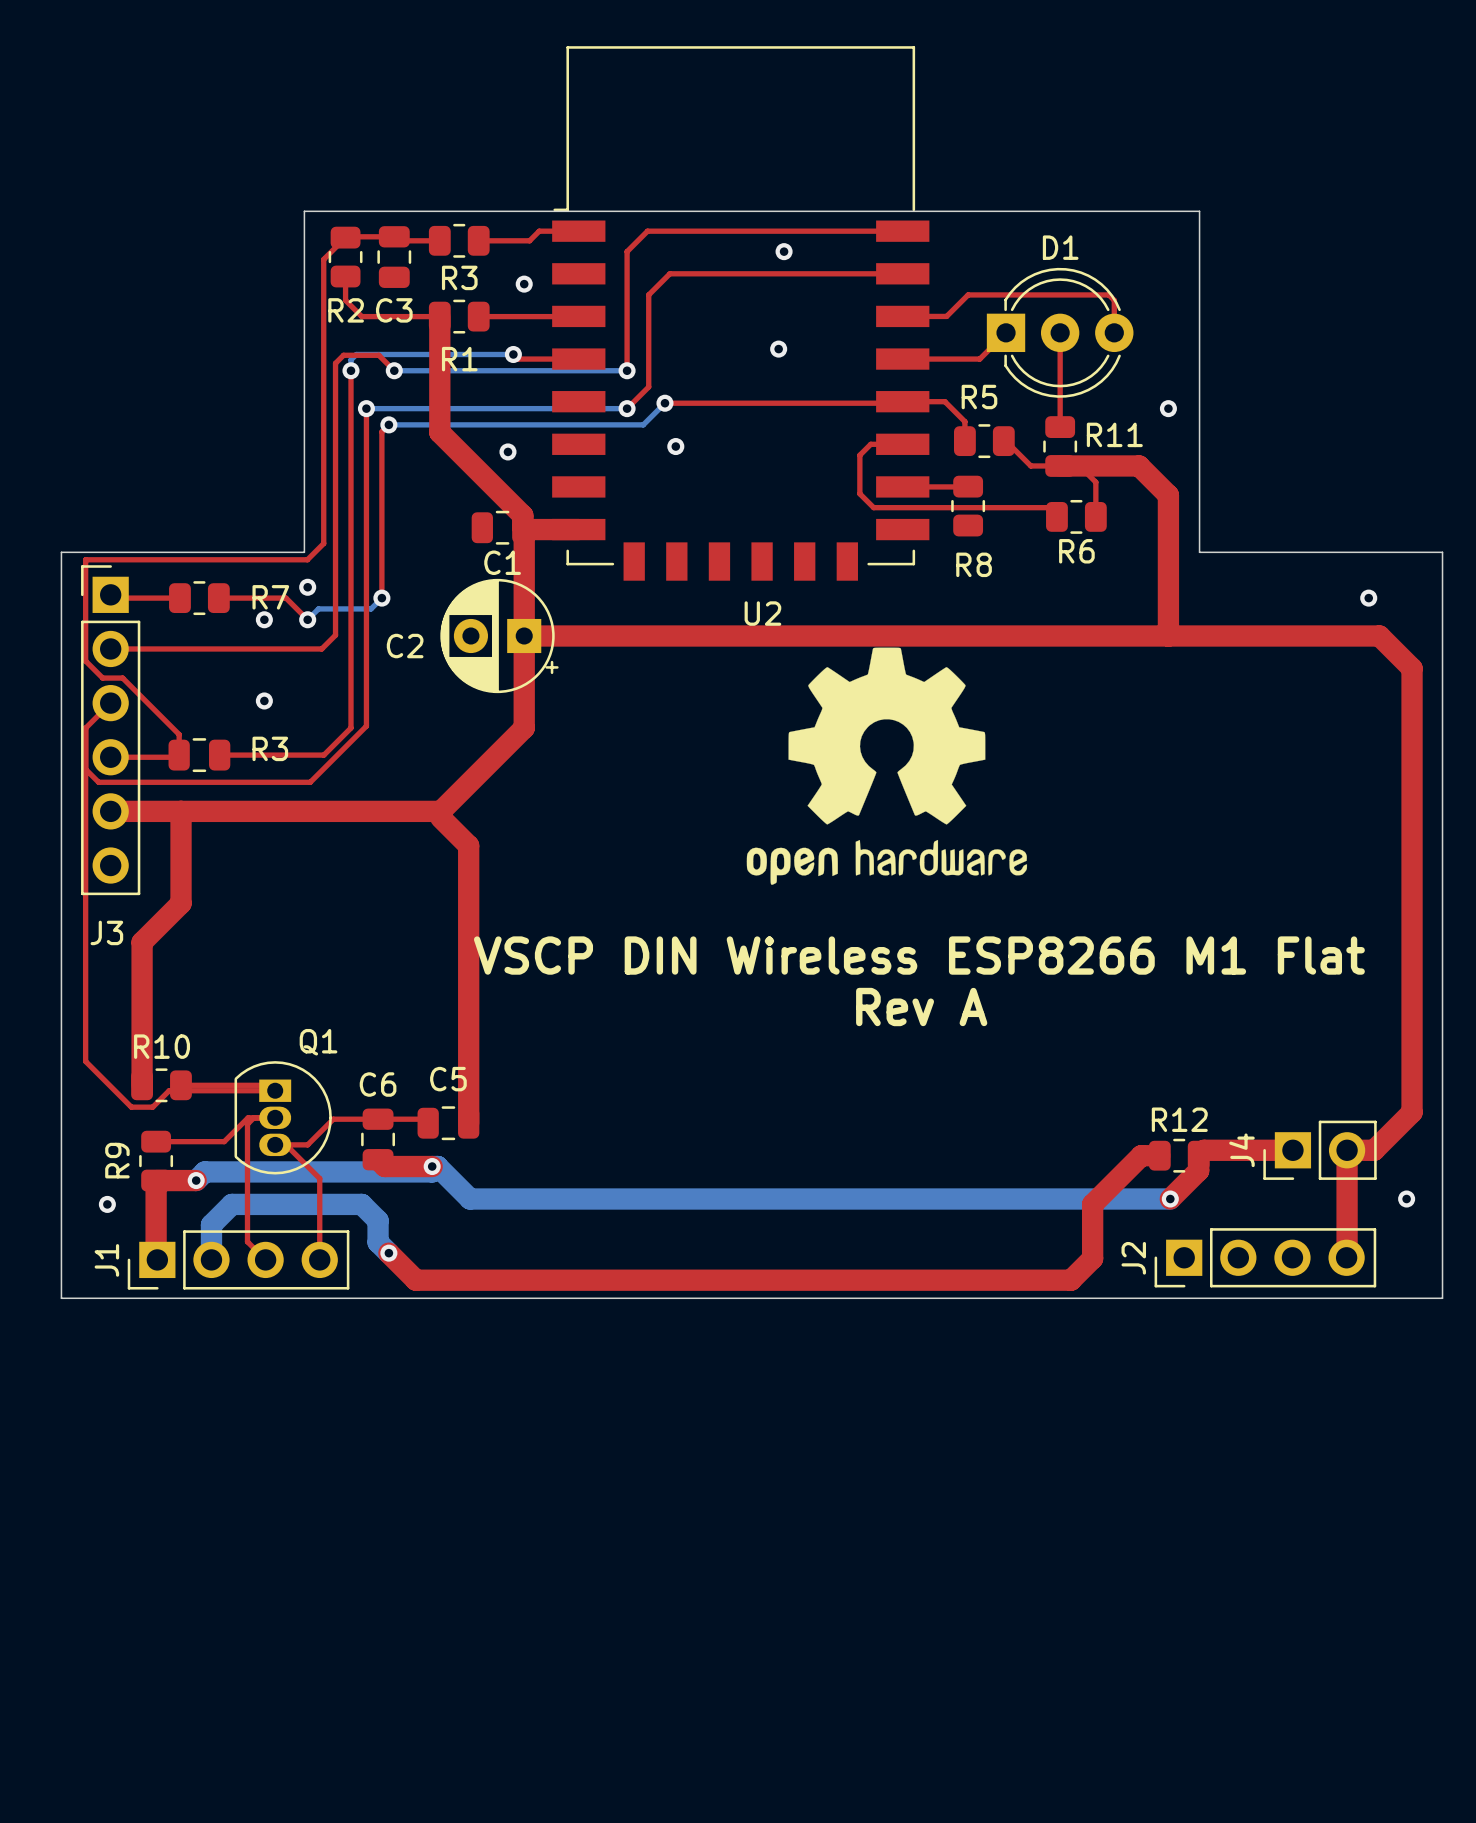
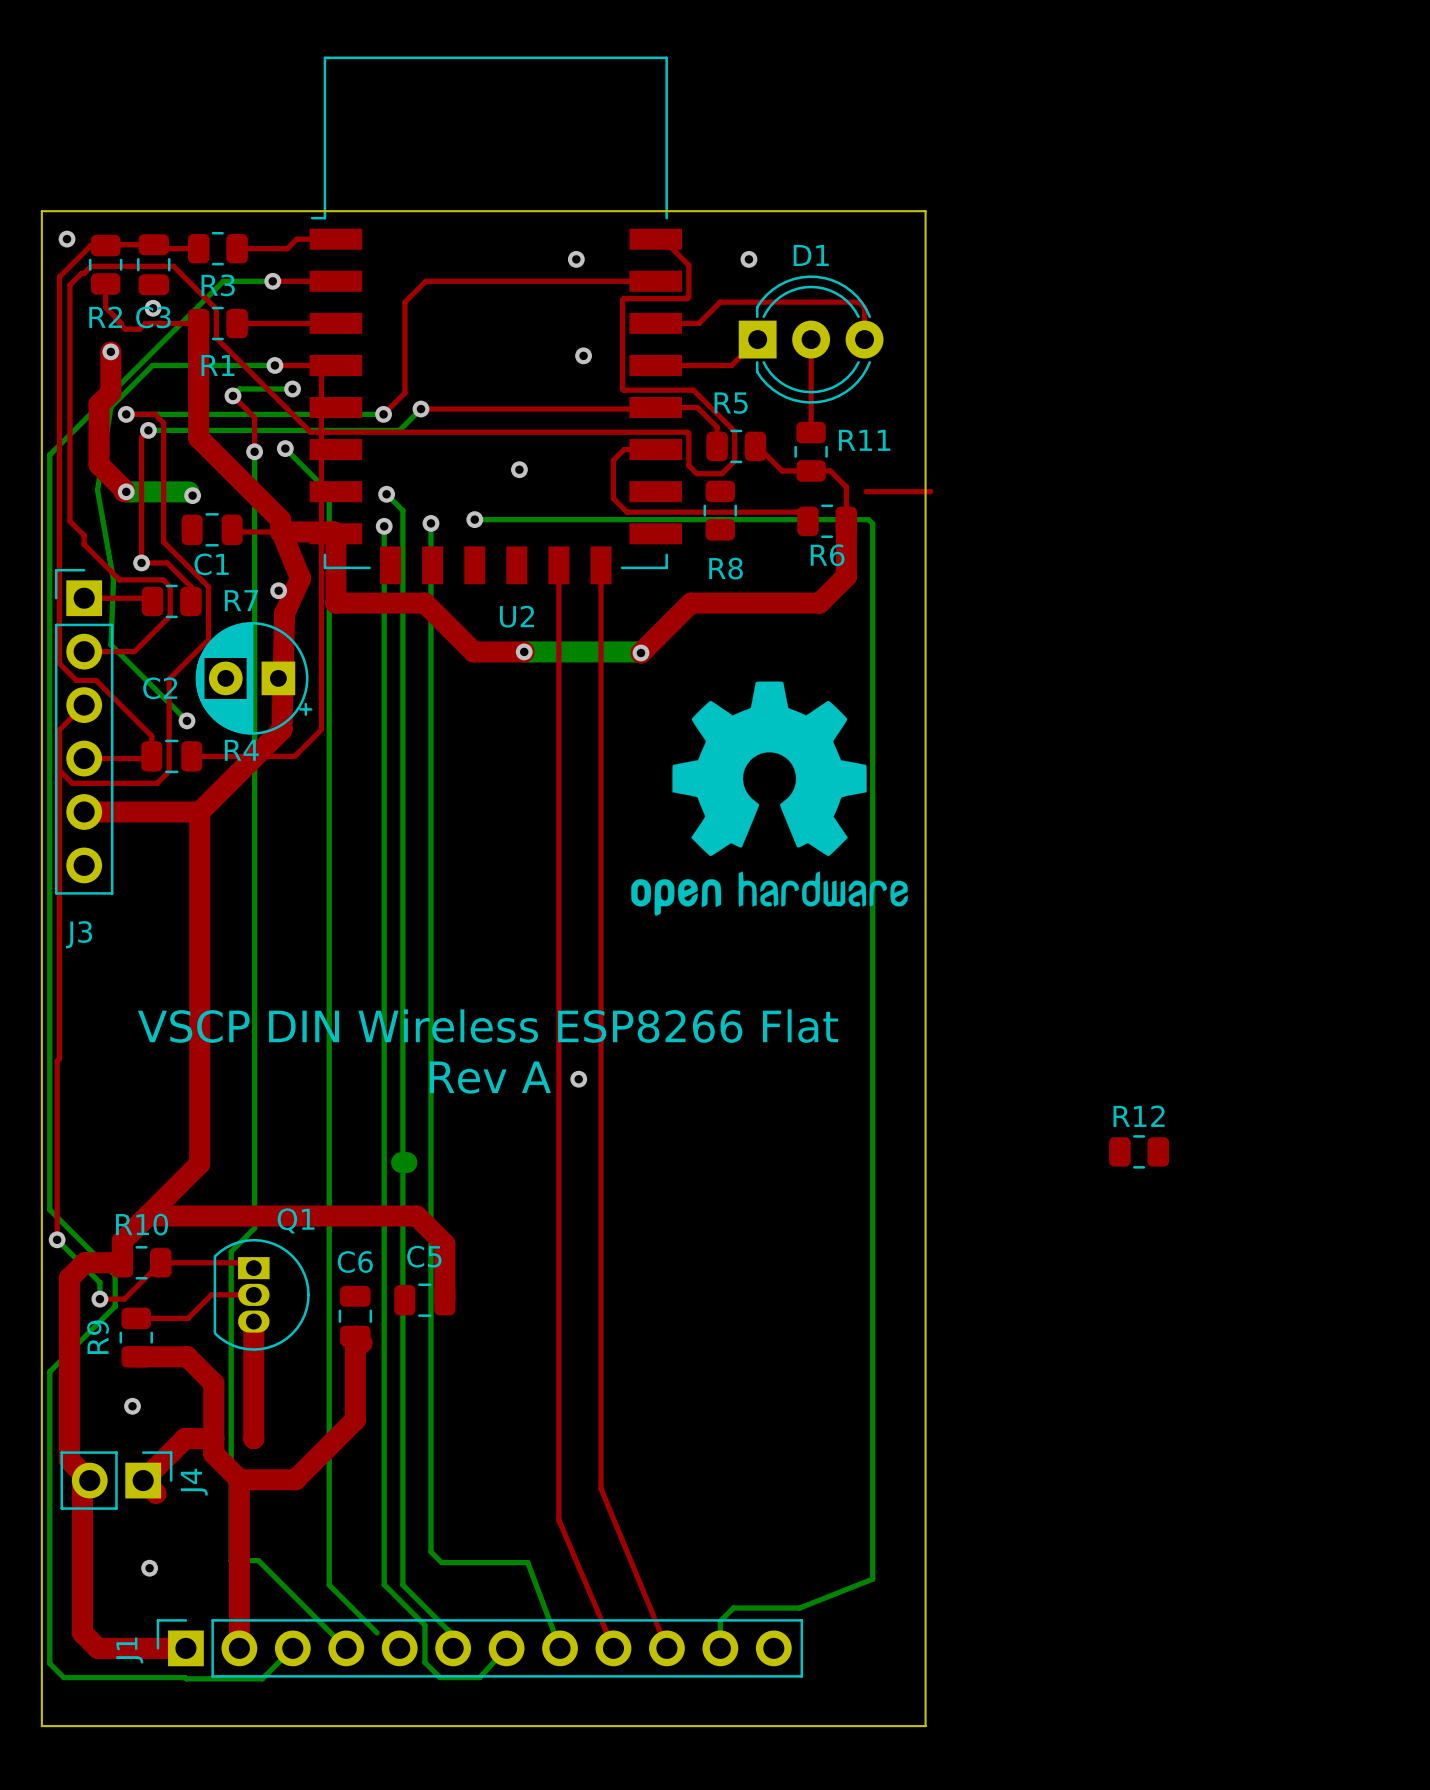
board edge: (304, 211) (304, 552) (61, 552) (61, 1298) (1442, 1298) (1442, 552) (1199, 552) (1199, 211) (304, 211) -> (41, 211) (41, 1726) (925, 1726) (925, 211) (41, 211)
via: none -> (67, 239)
top track: (578, 231) (539, 231) (529, 240) (478, 240) -> (335, 239) (296, 239) (287, 248) (237, 248)
top track: (689, 231) (647, 231) (627, 251) (627, 370) -> none
top track: (696, 231) (902, 231) -> none
top track: (439, 240) (398, 240) (394, 236) (346, 236) (323, 259) (323, 543) (307, 559) (85, 559) -> (198, 248) (157, 248) (153, 244) (90, 245) (59, 277) (59, 563)
R3 position: (459, 240) -> (217, 248)
via: none -> (576, 259)
R2 position: (345, 257) -> (105, 264)
C3 position: (394, 257) -> (153, 264)
top track: none -> (272, 281) (335, 281)
bottom track: none -> (272, 281) (223, 281) (49, 454) (49, 1209) (115, 1275) (115, 1306) (49, 1371) (49, 1663) (63, 1677) (262, 1678) (292, 1648)
via: none -> (272, 281)
top track: (669, 273) (648, 294) (648, 386) (627, 408) -> (636, 281) (425, 281) (404, 302) (404, 393) (383, 414)
top track: (689, 273) (902, 273) -> (420, 409) (631, 409)
top track: none -> (105, 283) (105, 307) (121, 323)
top track: (345, 276) (345, 300) (361, 316) -> (237, 323) (332, 323)
via: (524, 284) -> none
via: none -> (153, 308)
top track: none -> (115, 317) (125, 329) (139, 329) (145, 323) (198, 323) (198, 437) (280, 519) (280, 531)
U2 position: (740, 313) -> (495, 320)
top track: (365, 316) (439, 316) (439, 432) (522, 515) (522, 527) (524, 529) (578, 529) -> none
R1 position: (459, 316) -> (217, 323)
top track: (478, 316) (578, 316) -> none
top track: (902, 316) (946, 316) (968, 294) (1108, 294) (1114, 300) (1114, 332) -> (655, 323) (699, 323) (720, 302) (859, 302) (864, 307) (864, 339)
top track: (1006, 332) (979, 359) (902, 359) -> (757, 339) (731, 365) (655, 365)
top track: (1060, 332) (1060, 427) -> (811, 339) (811, 432)
D1 position: (1060, 332) -> (811, 339)
top track: none -> (110, 351) (110, 392) (99, 404) (99, 464) (124, 491)
via: none -> (110, 351)
via: (778, 349) -> none
top track: (513, 354) (517, 359) (578, 359) -> none
bottom track: (513, 354) (356, 354) (350, 359) (350, 370) -> none
via: (513, 354) -> none
top track: none -> (274, 365) (335, 365)
bottom track: none -> (274, 365) (152, 365) (111, 407) (97, 490) (113, 580) (111, 644) (187, 720)
via: none -> (274, 365)
via: (350, 370) -> none
top track: (394, 370) (378, 355) (343, 355) (335, 363) (335, 635) (321, 648) (161, 648) -> (662, 239) (688, 265) (688, 297) (622, 300) (622, 388) (693, 390) (734, 431) (734, 460) (721, 473) (697, 473) (688, 465) (687, 432) (310, 432) (216, 338) (216, 309) (173, 266) (91, 266) (81, 273) (69, 285) (69, 521) (84, 535) (84, 544) (119, 579) (163, 579) (170, 586) (170, 615) (134, 651)
bottom track: (394, 370) (627, 370) -> none
via: (394, 370) -> none
via position: (627, 370) -> (583, 355)
bottom track: none -> (292, 388) (239, 388) (232, 395)
via: none -> (292, 388)
top track: none -> (232, 395) (254, 417) (254, 451)
via: none -> (232, 395)
via: none -> (420, 409)
bottom track: (664, 403) (643, 424) (430, 424) -> (420, 409) (399, 430)
via: (664, 403) -> none
top track: (688, 403) (944, 401) (964, 421) (964, 441) -> (654, 409) (697, 407) (717, 427) (717, 446)
bottom track: none -> (126, 414) (336, 414)
via: none -> (126, 414)
top track: (366, 408) (366, 726) (310, 782) (184, 782) -> (126, 414) (154, 414) (163, 423) (163, 542) (208, 586) (208, 639) (169, 679) (169, 771) (157, 783)
via: (366, 408) -> none
bottom track: (413, 408) (627, 408) -> (148, 430) (358, 430)
via: none -> (383, 414)
via: (627, 408) -> none
via: (1168, 408) -> none
via: none -> (148, 430)
top track: (388, 424) (381, 431) (381, 598) -> none
via: (388, 424) -> none
top track: none -> (755, 446) (782, 470) (830, 470) (846, 487) (846, 576) (819, 603) (690, 603) (641, 653)
R5 position: (984, 441) -> (736, 446)
top track: (1003, 441) (1030, 465) (1079, 465) (1095, 482) (1095, 516) -> none
bottom track: none -> (285, 448) (329, 492) (329, 1585) (377, 1632)
via: none -> (285, 448)
top track: (902, 444) (870, 444) (859, 455) (859, 493) (873, 507) (1047, 507) (1056, 516) -> (655, 449) (624, 449) (613, 460) (613, 498) (627, 512) (798, 512) (807, 521)
bottom track: none -> (254, 451) (254, 1228) (231, 1251) (231, 1560) (258, 1560) (346, 1648)
via: none -> (254, 451)
via: (675, 446) -> none
R11 position: (1060, 446) -> (811, 451)
via: (507, 451) -> none
via: none -> (519, 469)
top track: (1060, 465) (1139, 465) (1168, 495) (1168, 636) -> none
bottom track: none -> (126, 491) (188, 491) (192, 495)
via: none -> (126, 491)
bottom track: none -> (386, 494) (402, 510) (402, 1585) (453, 1635) (453, 1648)
via: none -> (386, 494)
via: none -> (192, 495)
R8 position: (968, 506) -> (720, 510)
bottom track: none -> (474, 519) (868, 519) (872, 523) (872, 1579) (799, 1608) (733, 1608) (720, 1621) (720, 1648)
via: none -> (474, 519)
R6 position: (1076, 516) -> (827, 521)
bottom track: none -> (430, 523) (430, 1551) (441, 1562) (527, 1562) (560, 1648)
via: none -> (430, 523)
bottom track: none -> (384, 526) (384, 1584) (424, 1625) (424, 1662) (440, 1677) (479, 1677) (506, 1648)
via: none -> (384, 526)
top track: none -> (232, 529) (234, 531) (280, 531)
top track: none -> (280, 531) (334, 531) (335, 533) (335, 603) (424, 603) (473, 651) (524, 651)
C1 position: (502, 527) -> (212, 529)
top track: none -> (282, 533) (300, 578) (284, 613) (282, 729) (199, 811) (199, 1163) (122, 1241) (122, 1262) (84, 1262) (69, 1278) (69, 1460) (89, 1480) (82, 1487) (82, 1632) (98, 1648) (185, 1648)
top track: (524, 529) (524, 728) (440, 811) -> none
via: none -> (141, 562)
top track: none -> (558, 565) (558, 1520) (613, 1648)
top track: none -> (601, 565) (601, 1488) (666, 1648)
top track: (113, 598) (179, 598) -> (68, 590) (75, 598) (149, 598) (152, 601)
top track: (218, 598) (286, 598) (307, 619) -> (190, 601) (190, 586) (167, 562) (141, 562) (141, 437) (148, 430)
bottom track: (381, 598) (371, 608) (318, 608) (307, 619) -> none
via: (381, 598) -> none
via: (1368, 598) -> none
via: (264, 619) -> none
via: (307, 619) -> none
C2 position: (499, 636) -> (254, 678)
top track: (524, 636) (1379, 636) (1412, 668) (1412, 1112) (1374, 1150) (1347, 1150) (1346, 1257) -> none
bottom track: none -> (524, 651) (641, 653)
via: none -> (524, 651)
via: none -> (641, 653)
via position: (264, 700) -> (187, 720)
R3 name: R3 (270, 748) -> R4 (241, 750)
drawing position: (886, 766) -> (769, 798)
top track: (181, 811) (181, 903) (142, 942) (142, 1085) -> none
top track: (227, 811) (440, 811) -> none
top track: (440, 811) (440, 817) (468, 845) (468, 1123) -> none
text: VSCP DIN Wireless ESP8266 M1 Flat (919, 955) -> none
text position: Rev A (921, 1007) -> Rev A (490, 1077)
text: none -> VSCP DIN Wireless ESP8266 Flat (488, 1026)
top track: (85, 1061) (131, 1107) (152, 1107) (169, 1090) (275, 1090) (269, 1085) (180, 1085) -> (59, 1058) (57, 1061) (57, 1239)
via: none -> (578, 1079)
R10 position: (161, 1085) -> (141, 1262)
top track: (253, 1117) (247, 1124) (247, 1241) (265, 1259) -> none
top track: (275, 1117) (248, 1117) (224, 1141) (156, 1141) -> none
Q1 position: (283, 1117) -> (261, 1294)
top track: (428, 1123) (424, 1119) (333, 1119) (307, 1144) (275, 1144) -> none
C5 position: (448, 1123) -> (424, 1300)
C6 position: (378, 1139) -> (355, 1316)
top track: (286, 1144) (319, 1178) (319, 1259) -> none
top track: (1292, 1150) (1204, 1150) (1198, 1155) (1198, 1170) (1170, 1199) -> none
J4 rotation: 0° (1320, 1150) -> 180° (116, 1480)
J4 position: (1320, 1150) -> (116, 1480)
top track: (1159, 1155) (1141, 1155) (1092, 1204) (1092, 1258) (1070, 1280) (415, 1280) (388, 1253) -> none
top track: (378, 1159) (384, 1166) (432, 1166) -> none
R9 position: (156, 1161) -> (136, 1337)
via: (432, 1166) -> none
top track: (196, 1180) (156, 1180) (157, 1259) -> none
bottom track: (196, 1180) (204, 1171) (432, 1171) (437, 1166) (470, 1199) (1170, 1199) -> none
via: (196, 1180) -> none
via: (1170, 1199) -> none
via: (1406, 1199) -> none
via position: (107, 1204) -> (57, 1239)
top track: none -> (147, 1216) (416, 1216) (444, 1244) (444, 1300)
J1 footprint: [127, 1230, 350, 1290] -> [156, 1619, 804, 1678]
bottom track: none -> (57, 1239) (99, 1282) (99, 1299)
bottom track: (388, 1253) (378, 1242) (378, 1220) (361, 1204) (231, 1204) (211, 1224) (211, 1259) -> none
via: (388, 1253) -> none
J2: (1265, 1257) -> none
J1 name position: J1 (106, 1260) -> J1 (129, 1650)
top track: none -> (253, 1268) (248, 1262) (160, 1262) (124, 1299) (99, 1299)
top track: none -> (253, 1294) (211, 1294) (188, 1318) (136, 1318)
via: none -> (99, 1299)
top track: none -> (253, 1321) (253, 1438)
top track: none -> (362, 1342) (355, 1336) (355, 1419) (295, 1479) (239, 1479) (213, 1453) (213, 1383) (187, 1356) (136, 1356)
via: none -> (132, 1406)
top track: none -> (213, 1438) (185, 1438) (143, 1480) (156, 1493)
top track: none -> (239, 1480) (239, 1648)
via: none -> (149, 1568)

